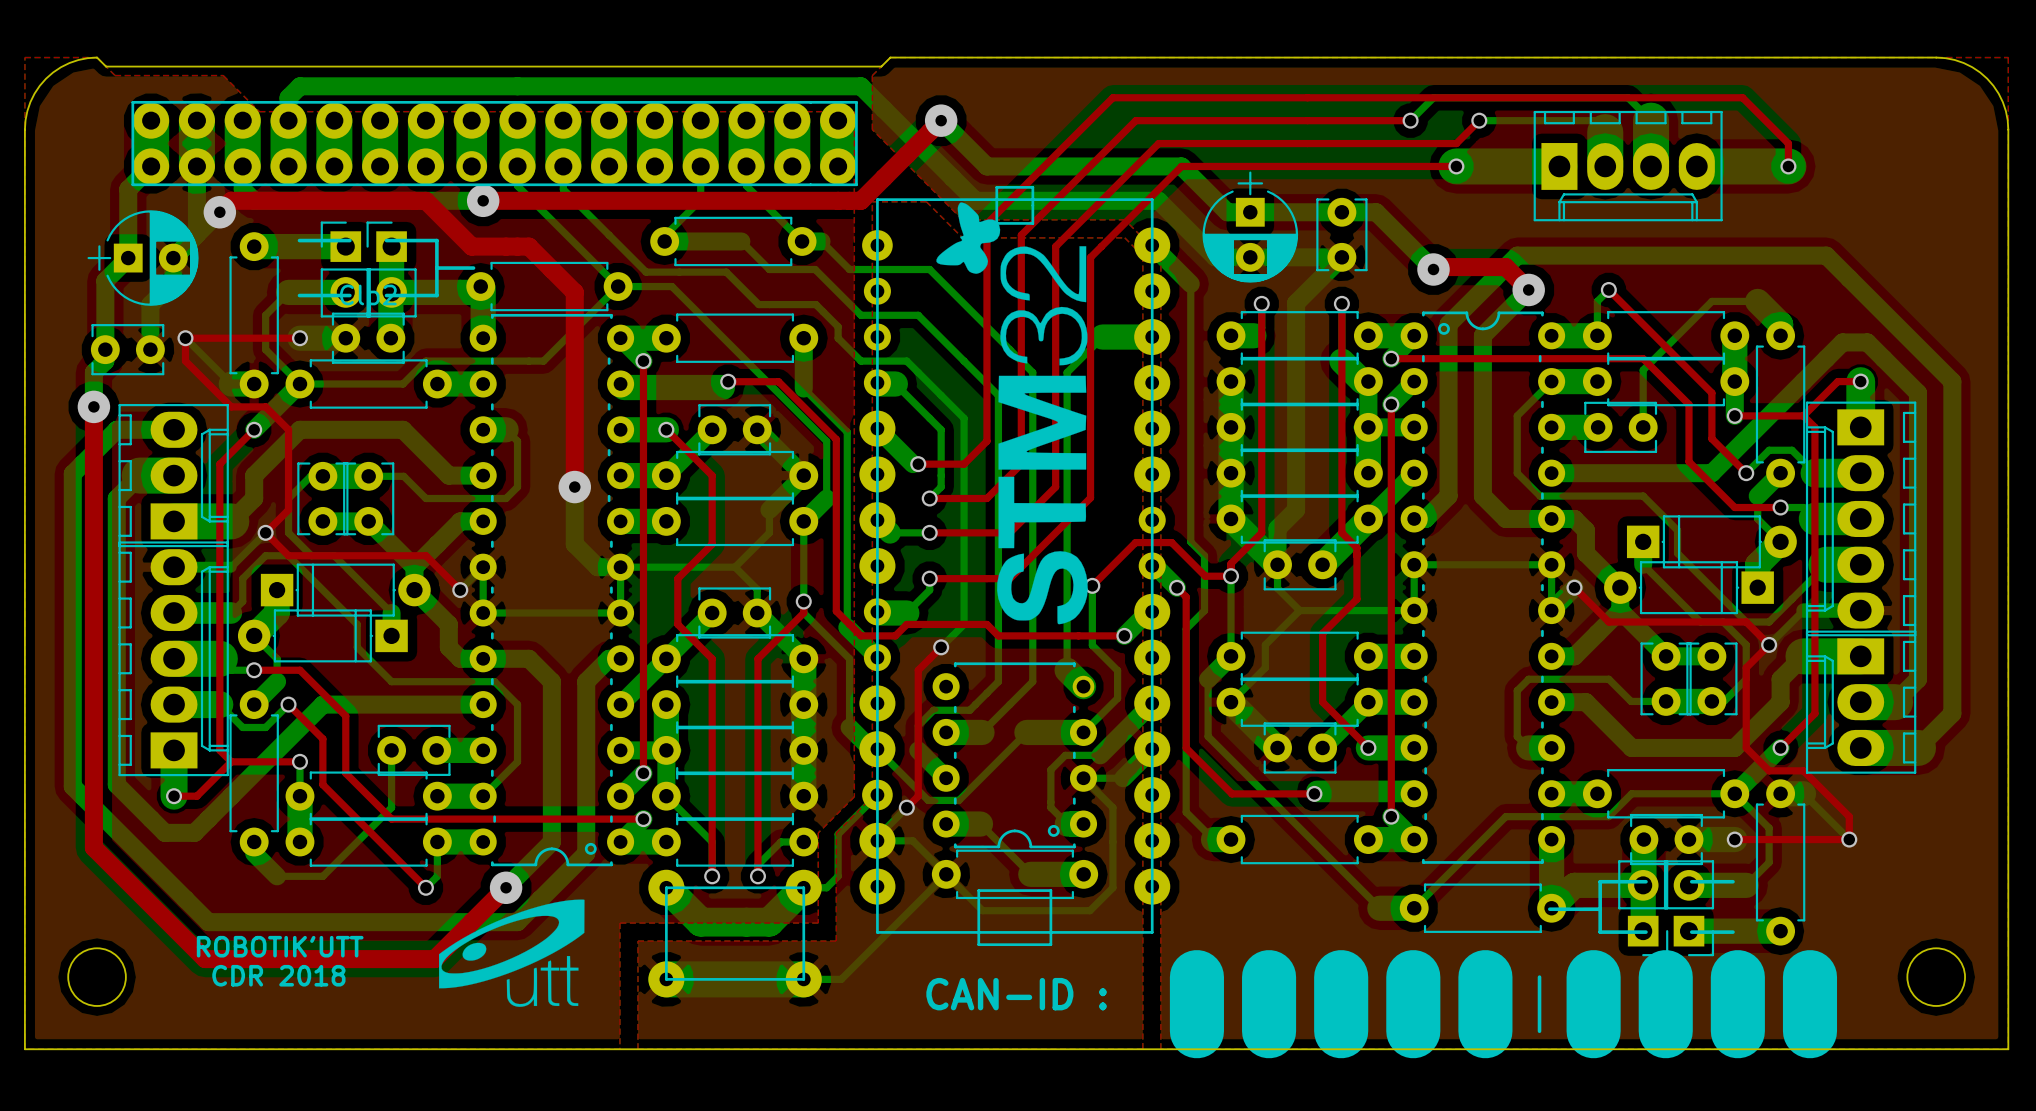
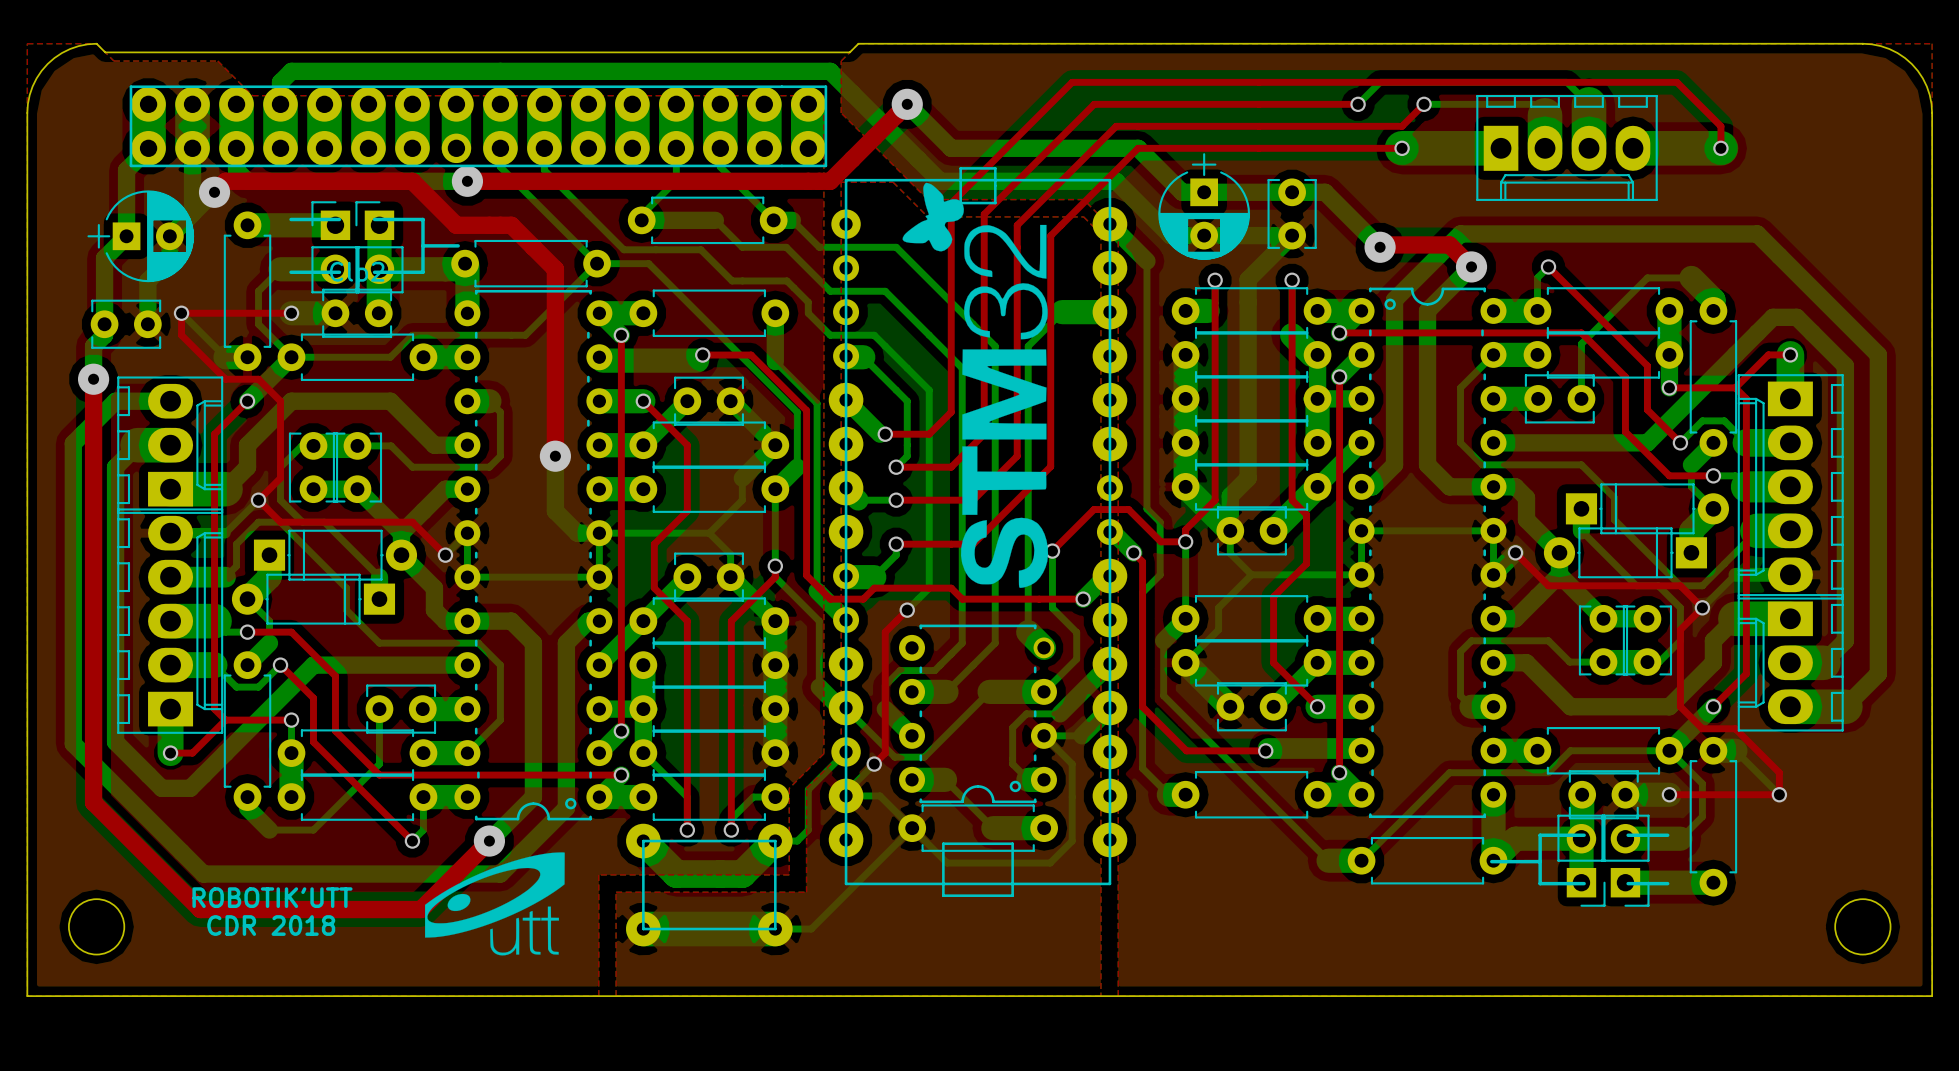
line: (1196, 977) (1196, 1031) -> none
line: (1269, 977) (1269, 1031) -> none
line: (1341, 977) (1341, 1031) -> none
line: (1413, 977) (1413, 1031) -> none
line: (1485, 977) (1485, 1031) -> none
line: (1539, 977) (1539, 1031) -> none
line: (1593, 977) (1593, 1031) -> none
line: (1665, 977) (1665, 1031) -> none
line: (1737, 977) (1737, 1031) -> none
line: (1809, 977) (1809, 1031) -> none
text: CAN-ID : (1016, 994) -> none

